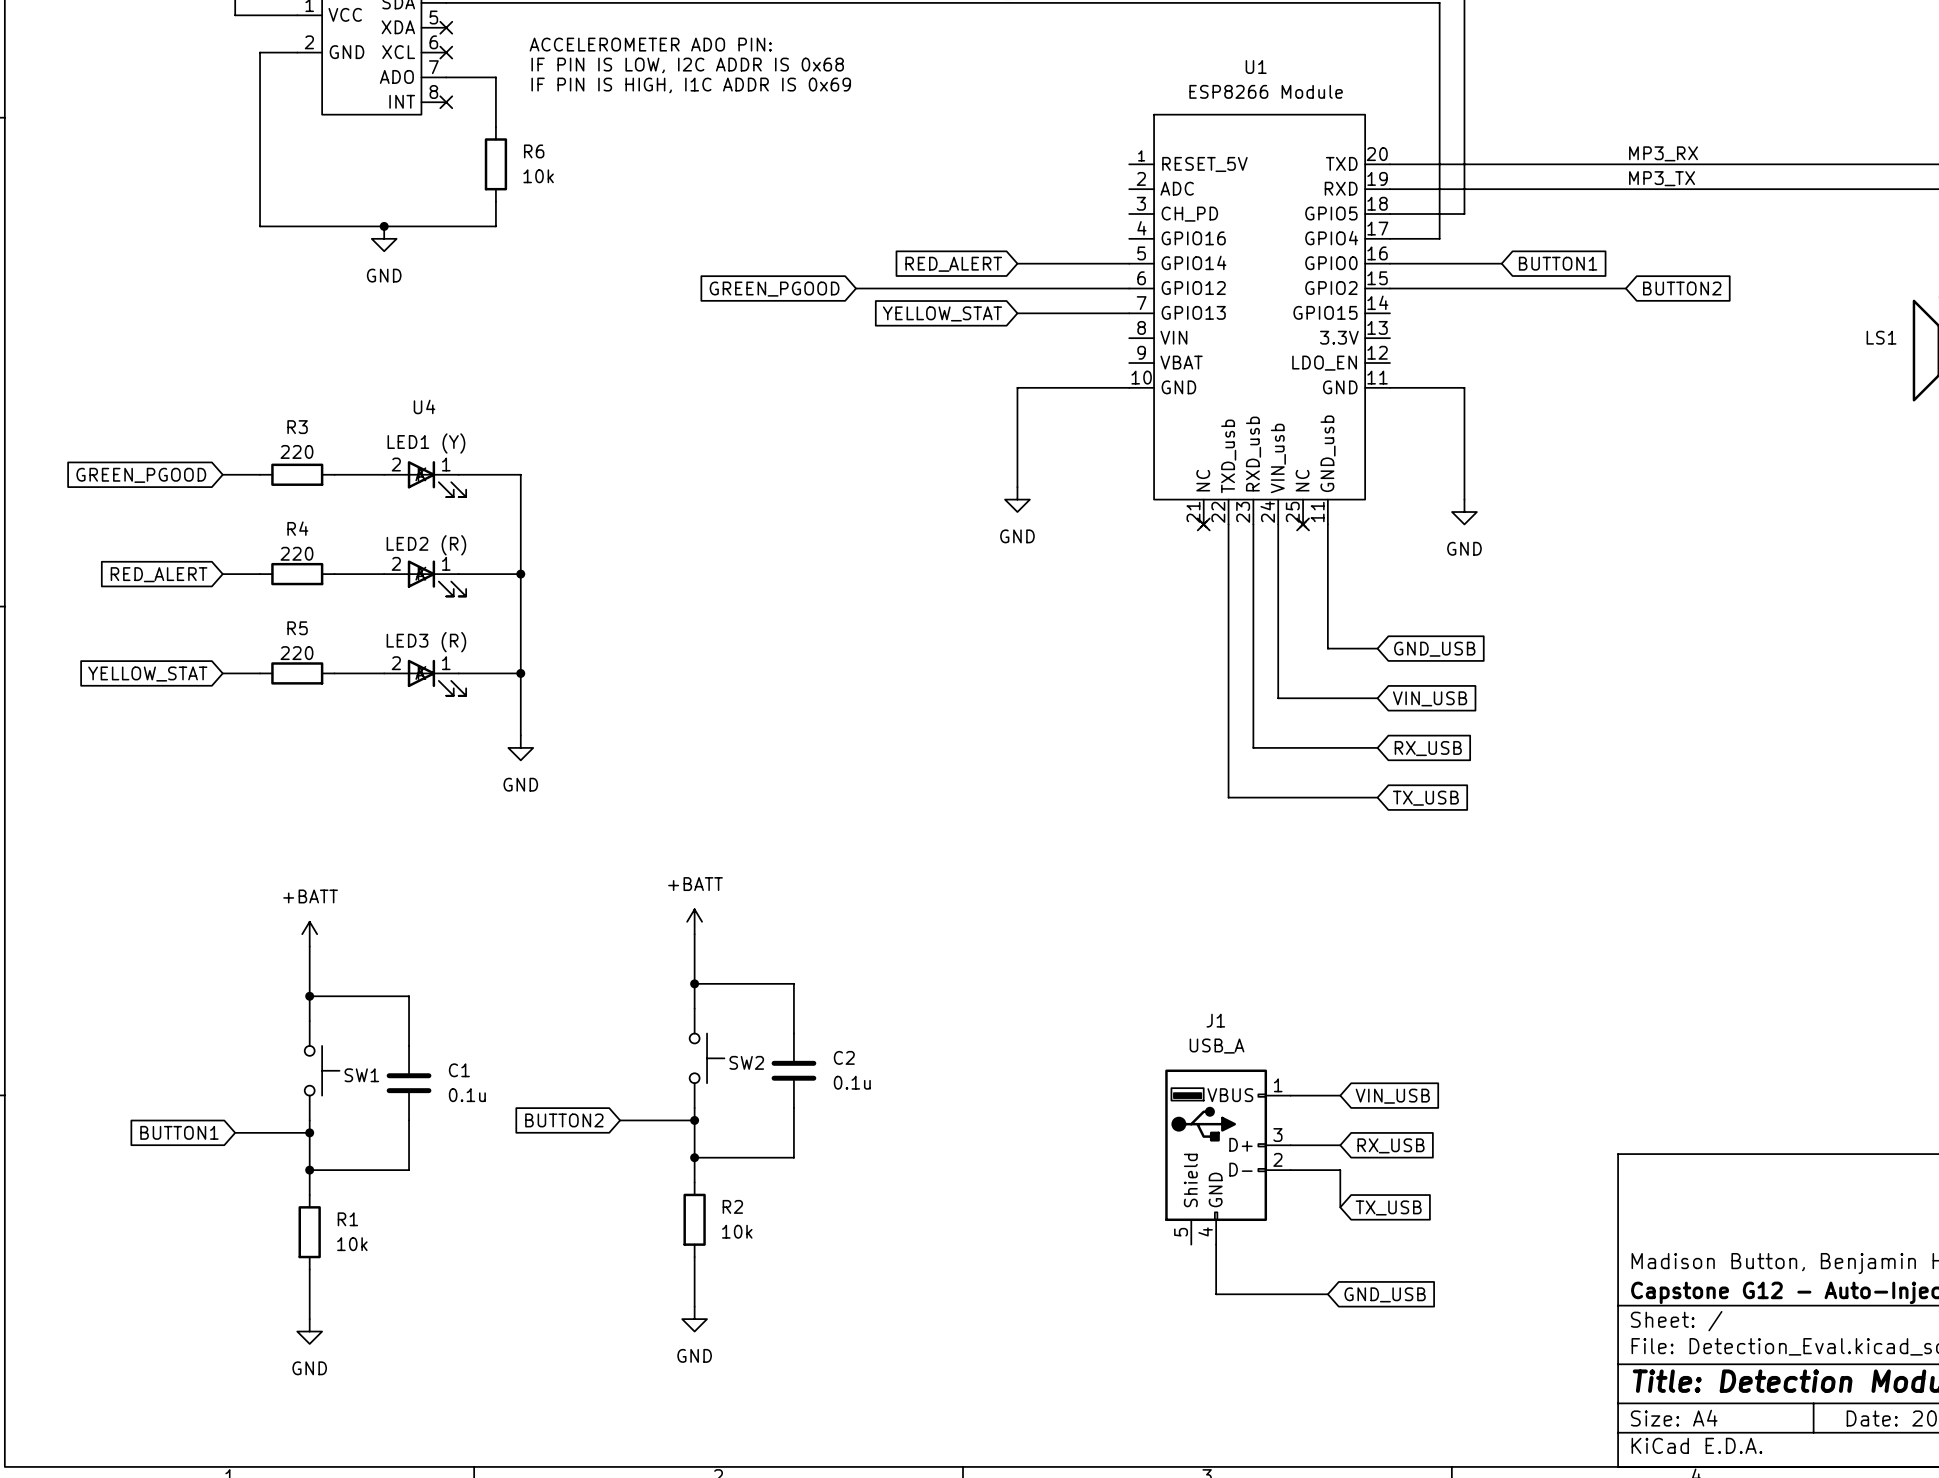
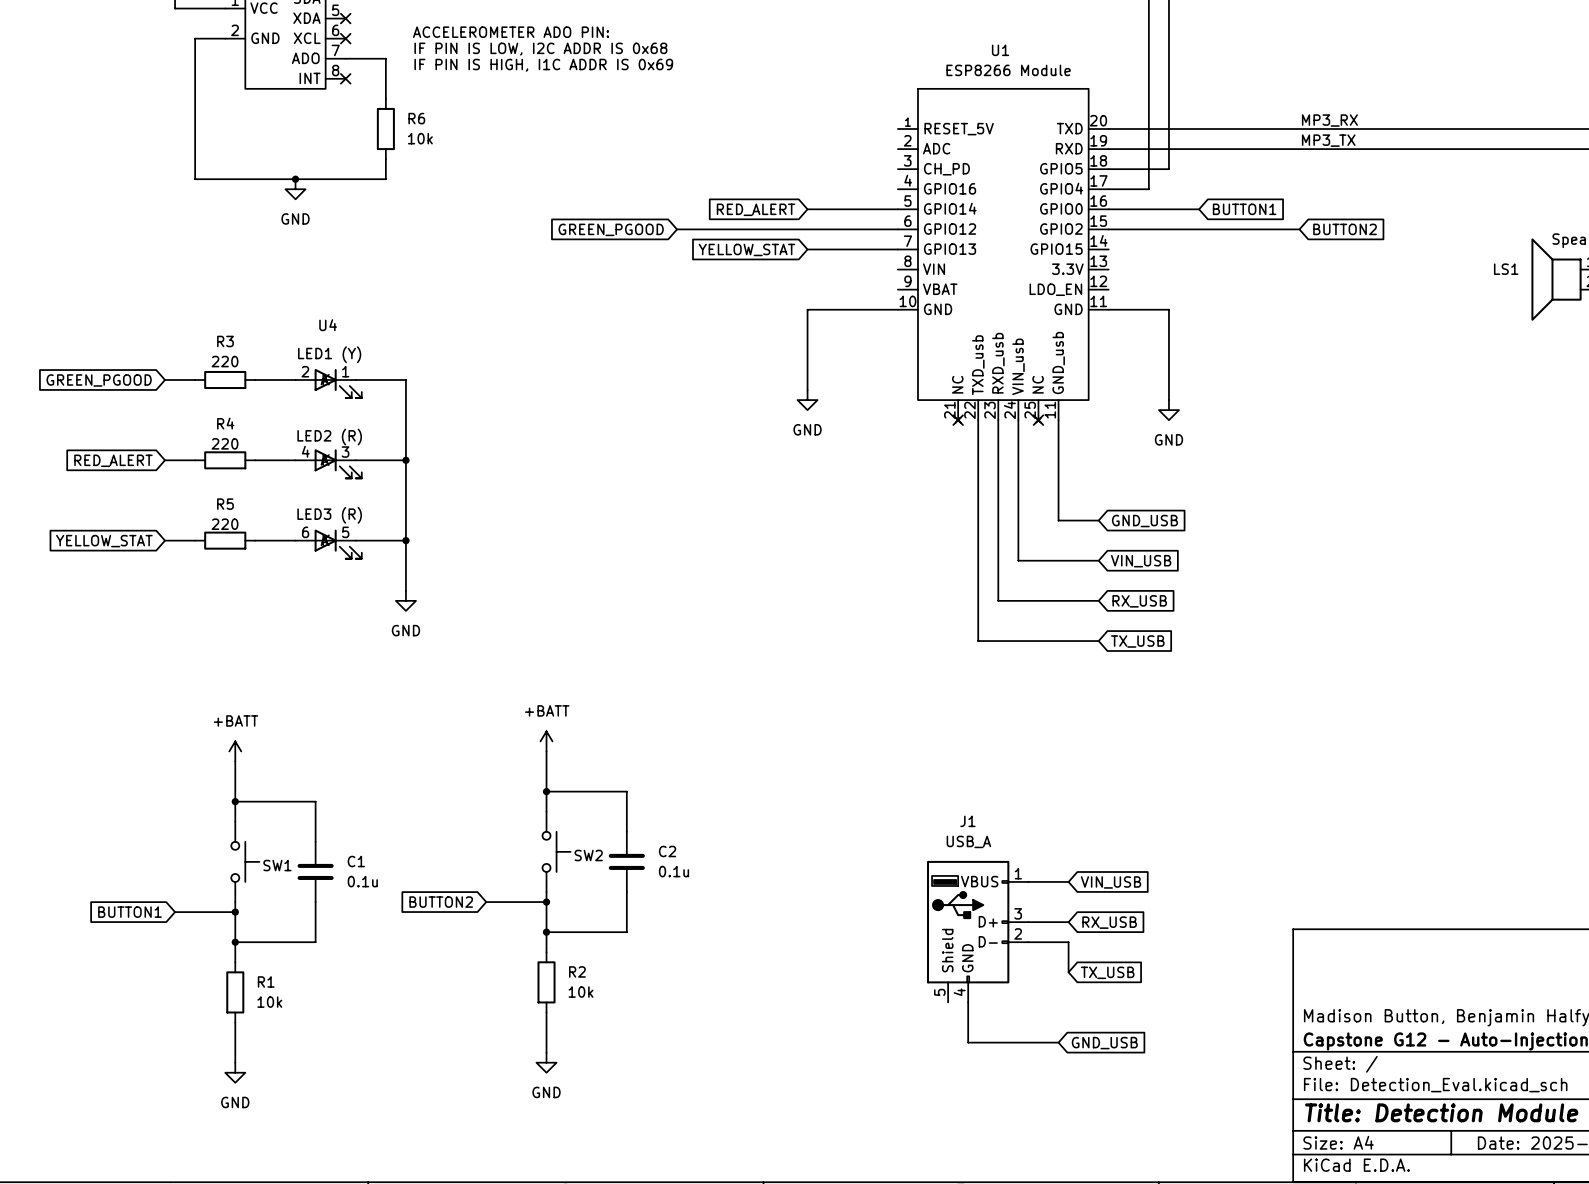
U4 pin number: 2 (396, 563) -> 4 (305, 451)
U4 pin number: 1 (446, 563) -> 3 (345, 452)
U4 pin number: 2 (396, 663) -> 6 (305, 532)
U4 pin number: 1 (446, 663) -> 5 (345, 532)

